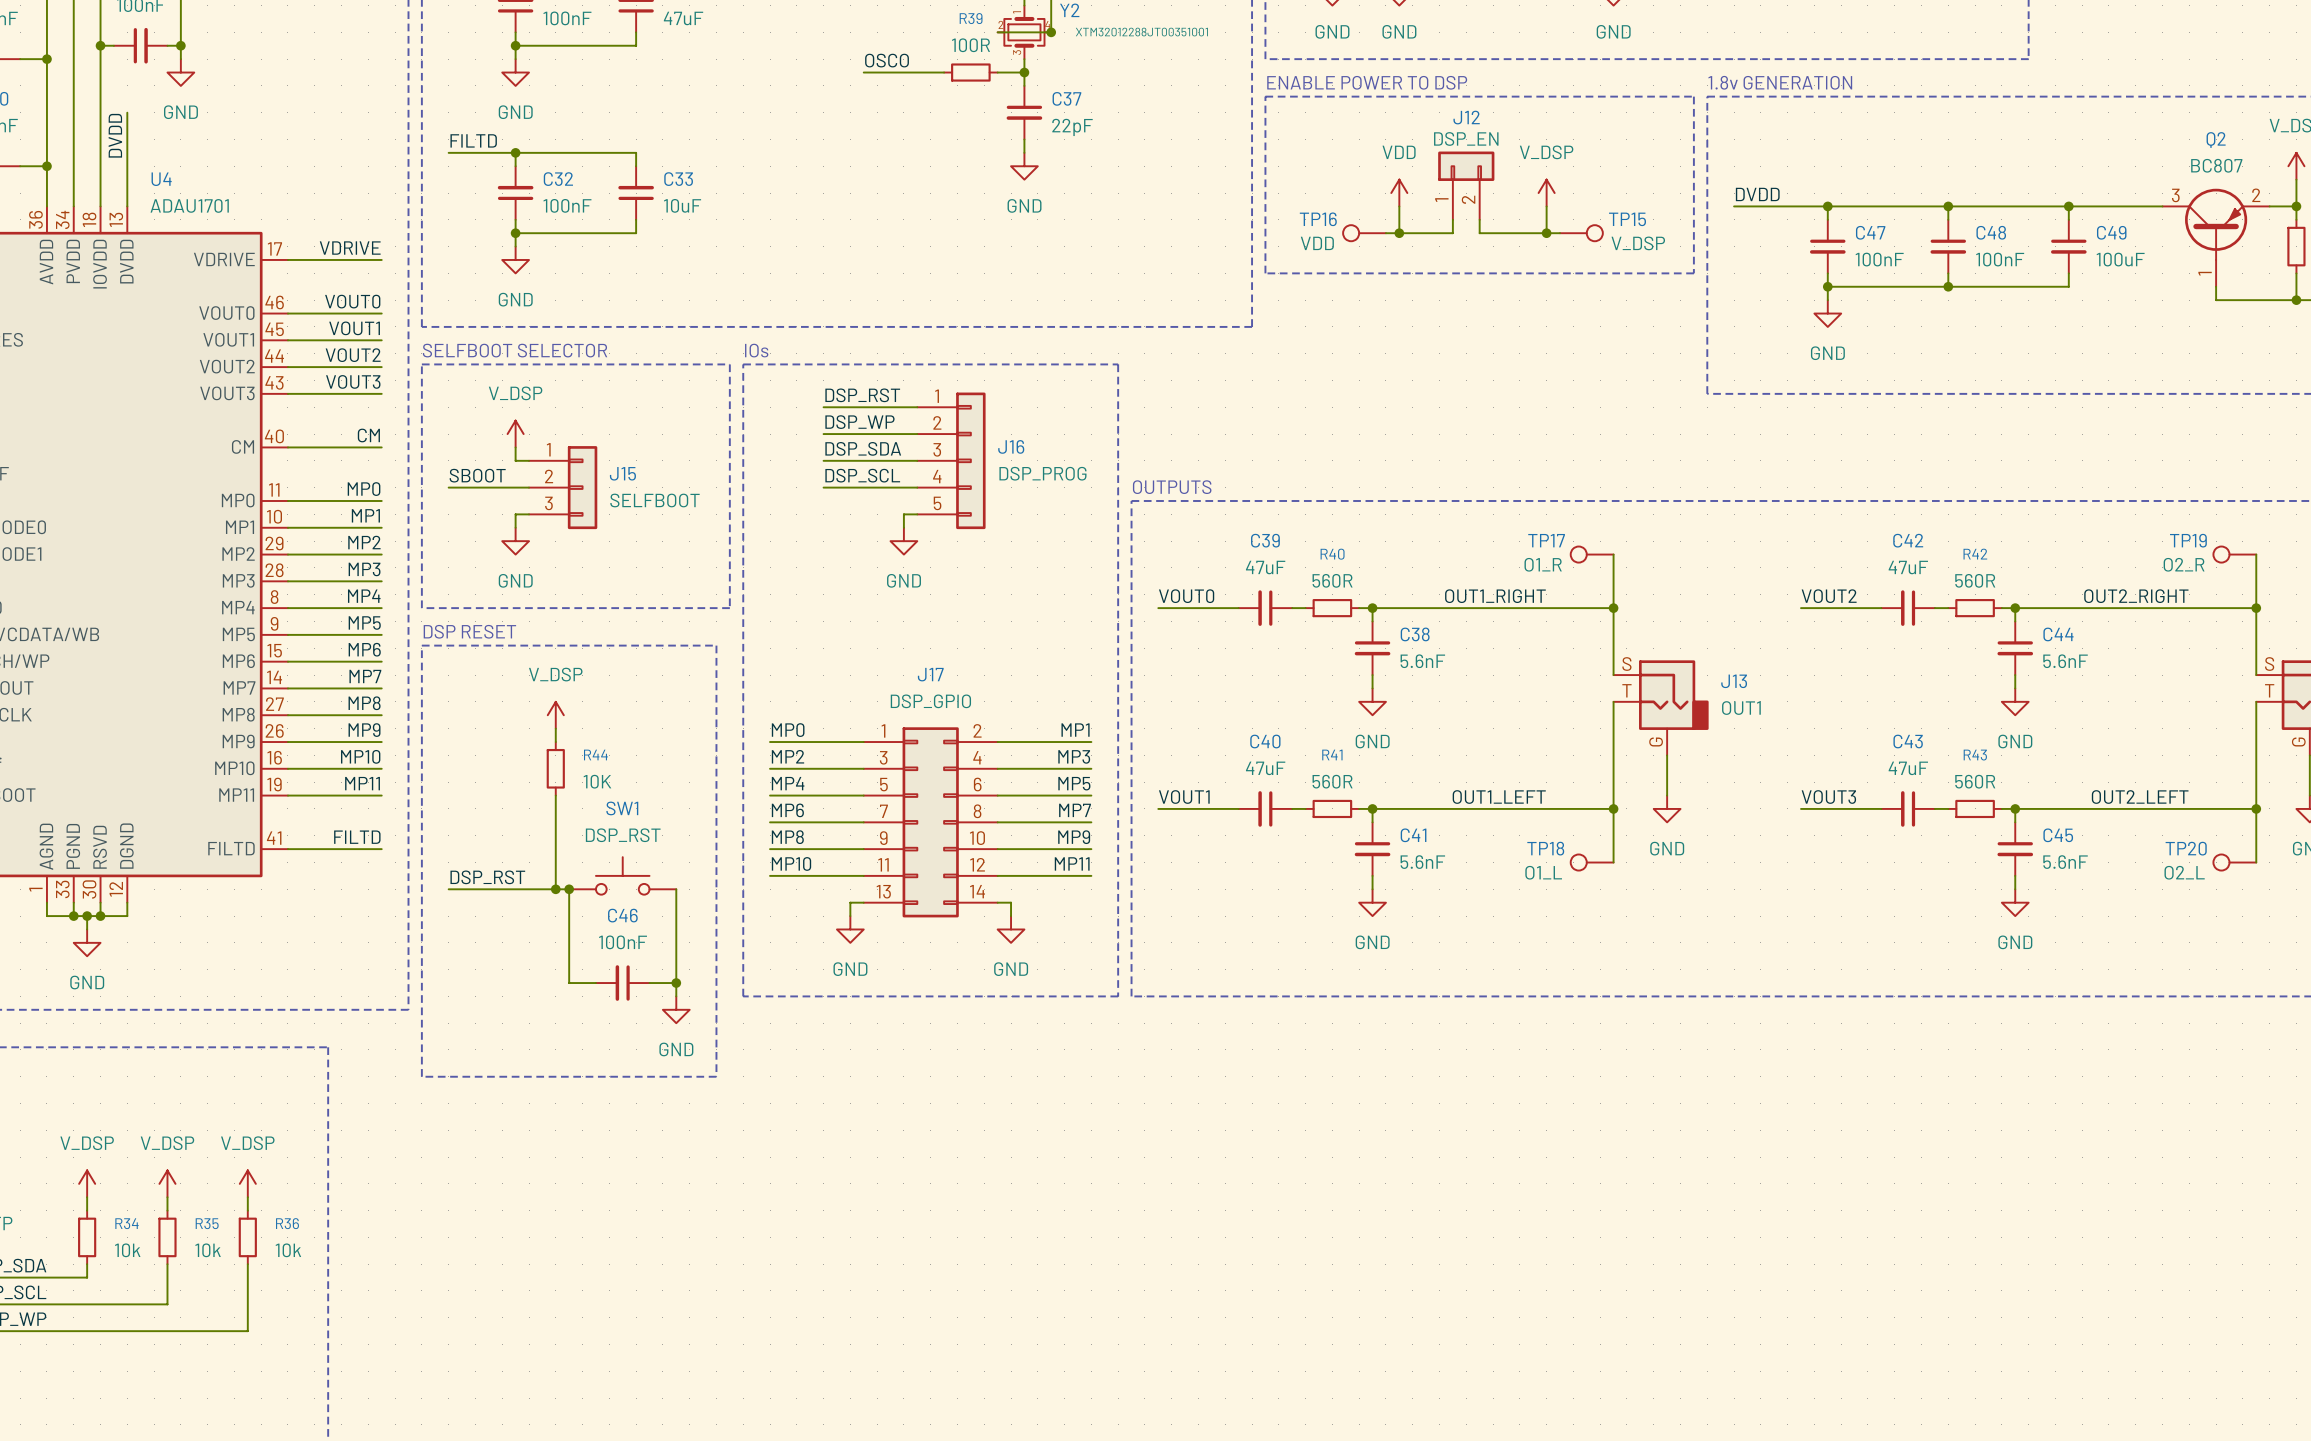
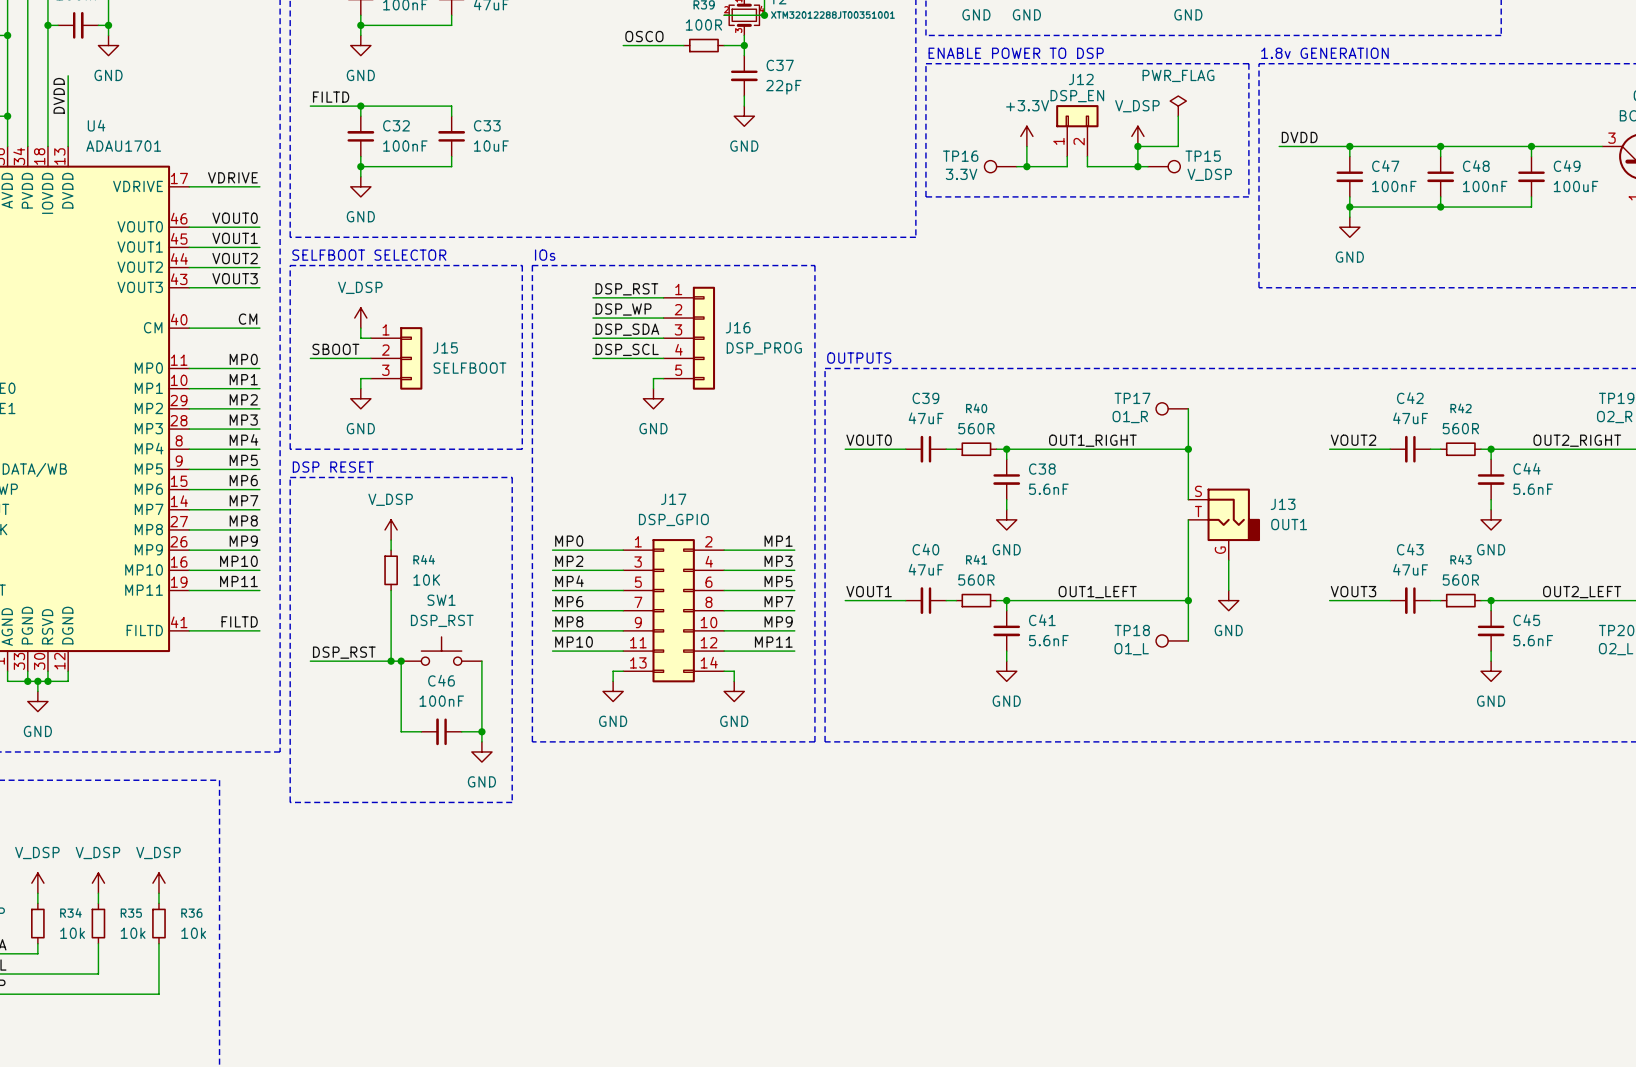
power symbol: none -> PWR_FLAG (1178, 106)
wire: none -> (1178, 116) (1178, 146) (1137, 146)
power symbol: VDD (1399, 193) -> +3.3V (1026, 136)
junction: none -> (1137, 146)
TP16 value: VDD (1317, 243) -> 3.3V (961, 174)

